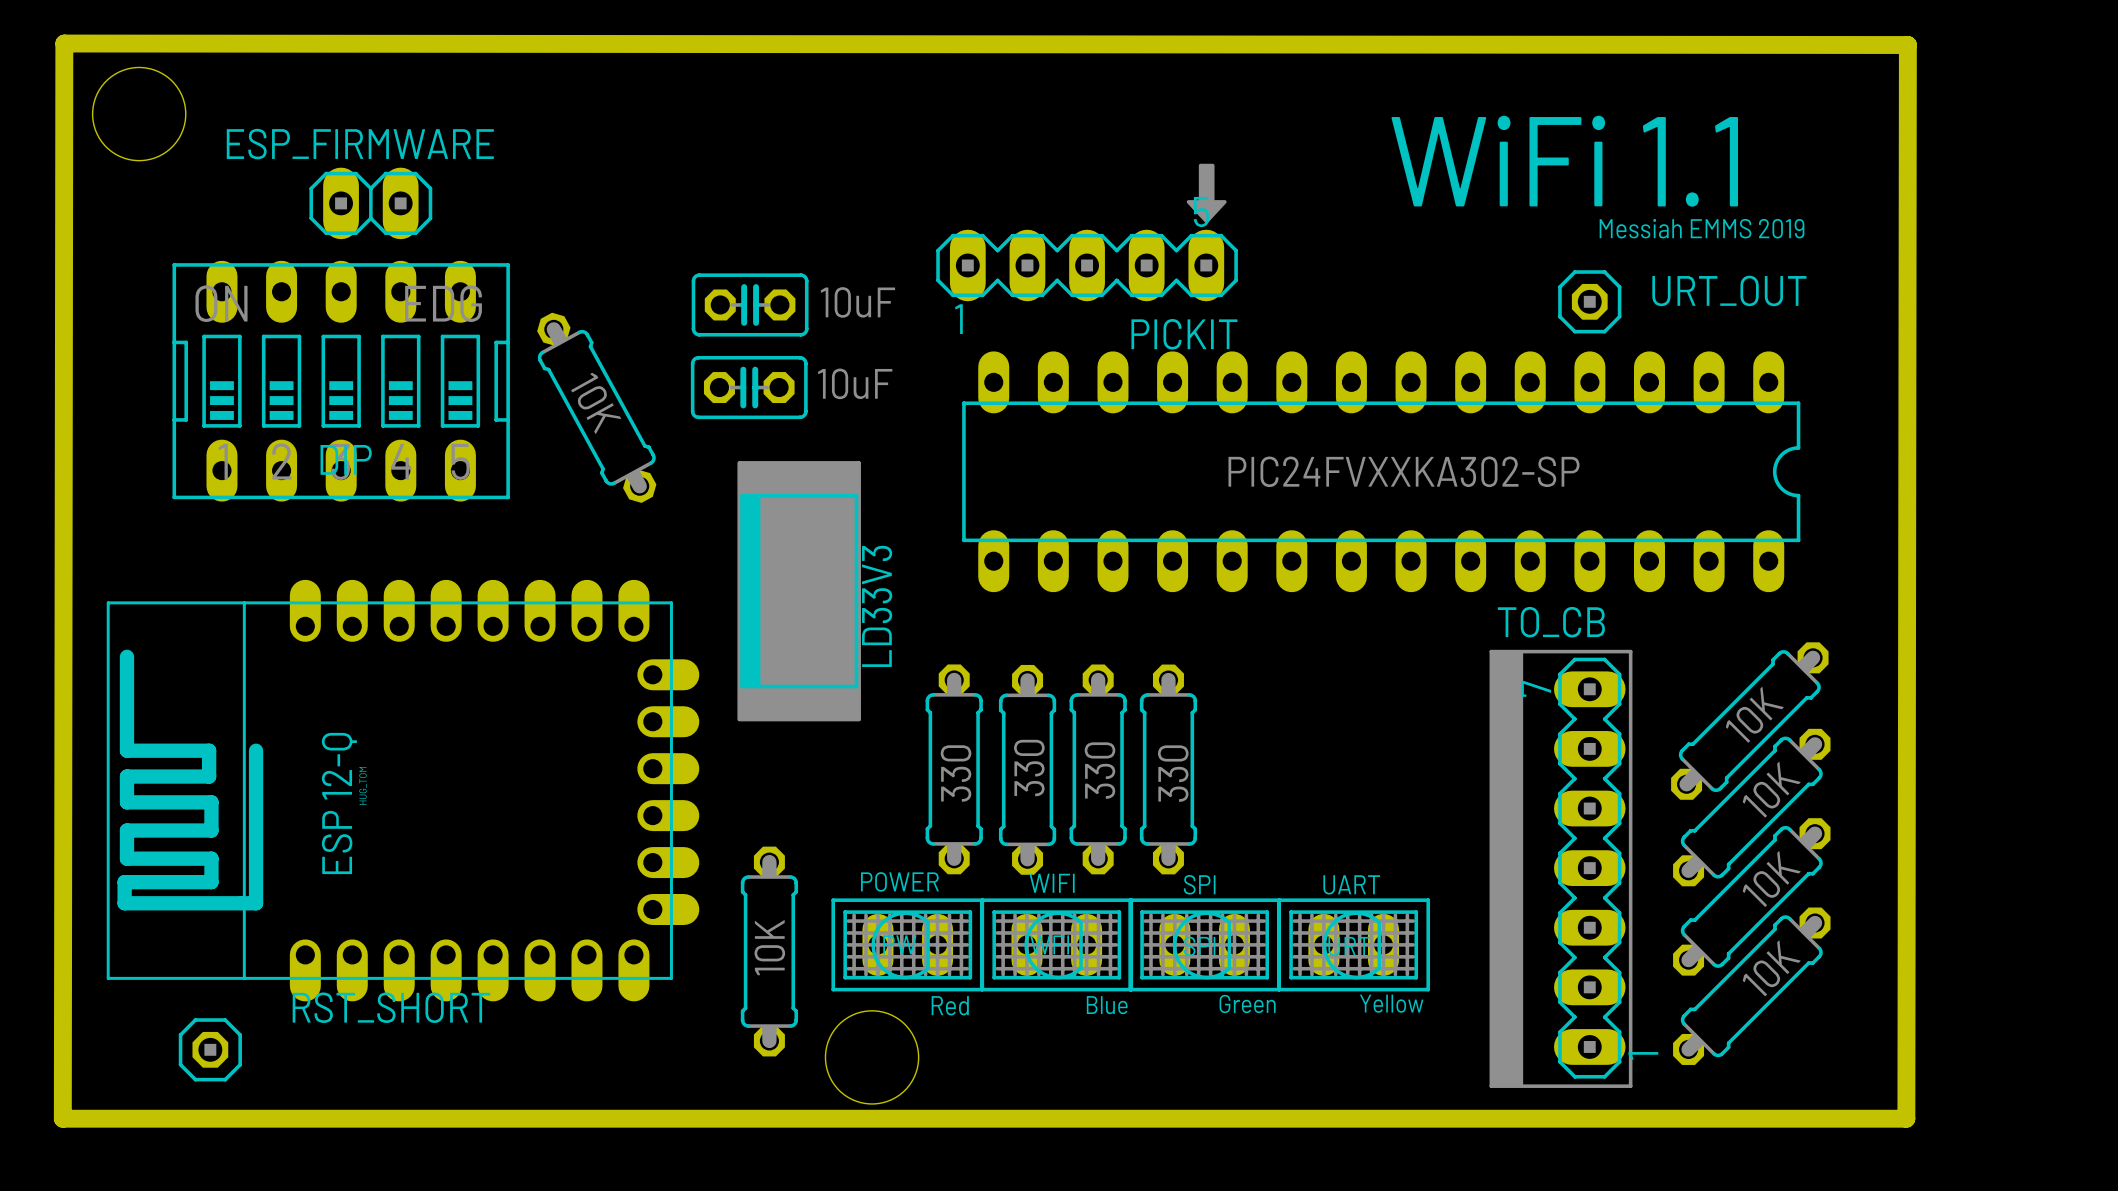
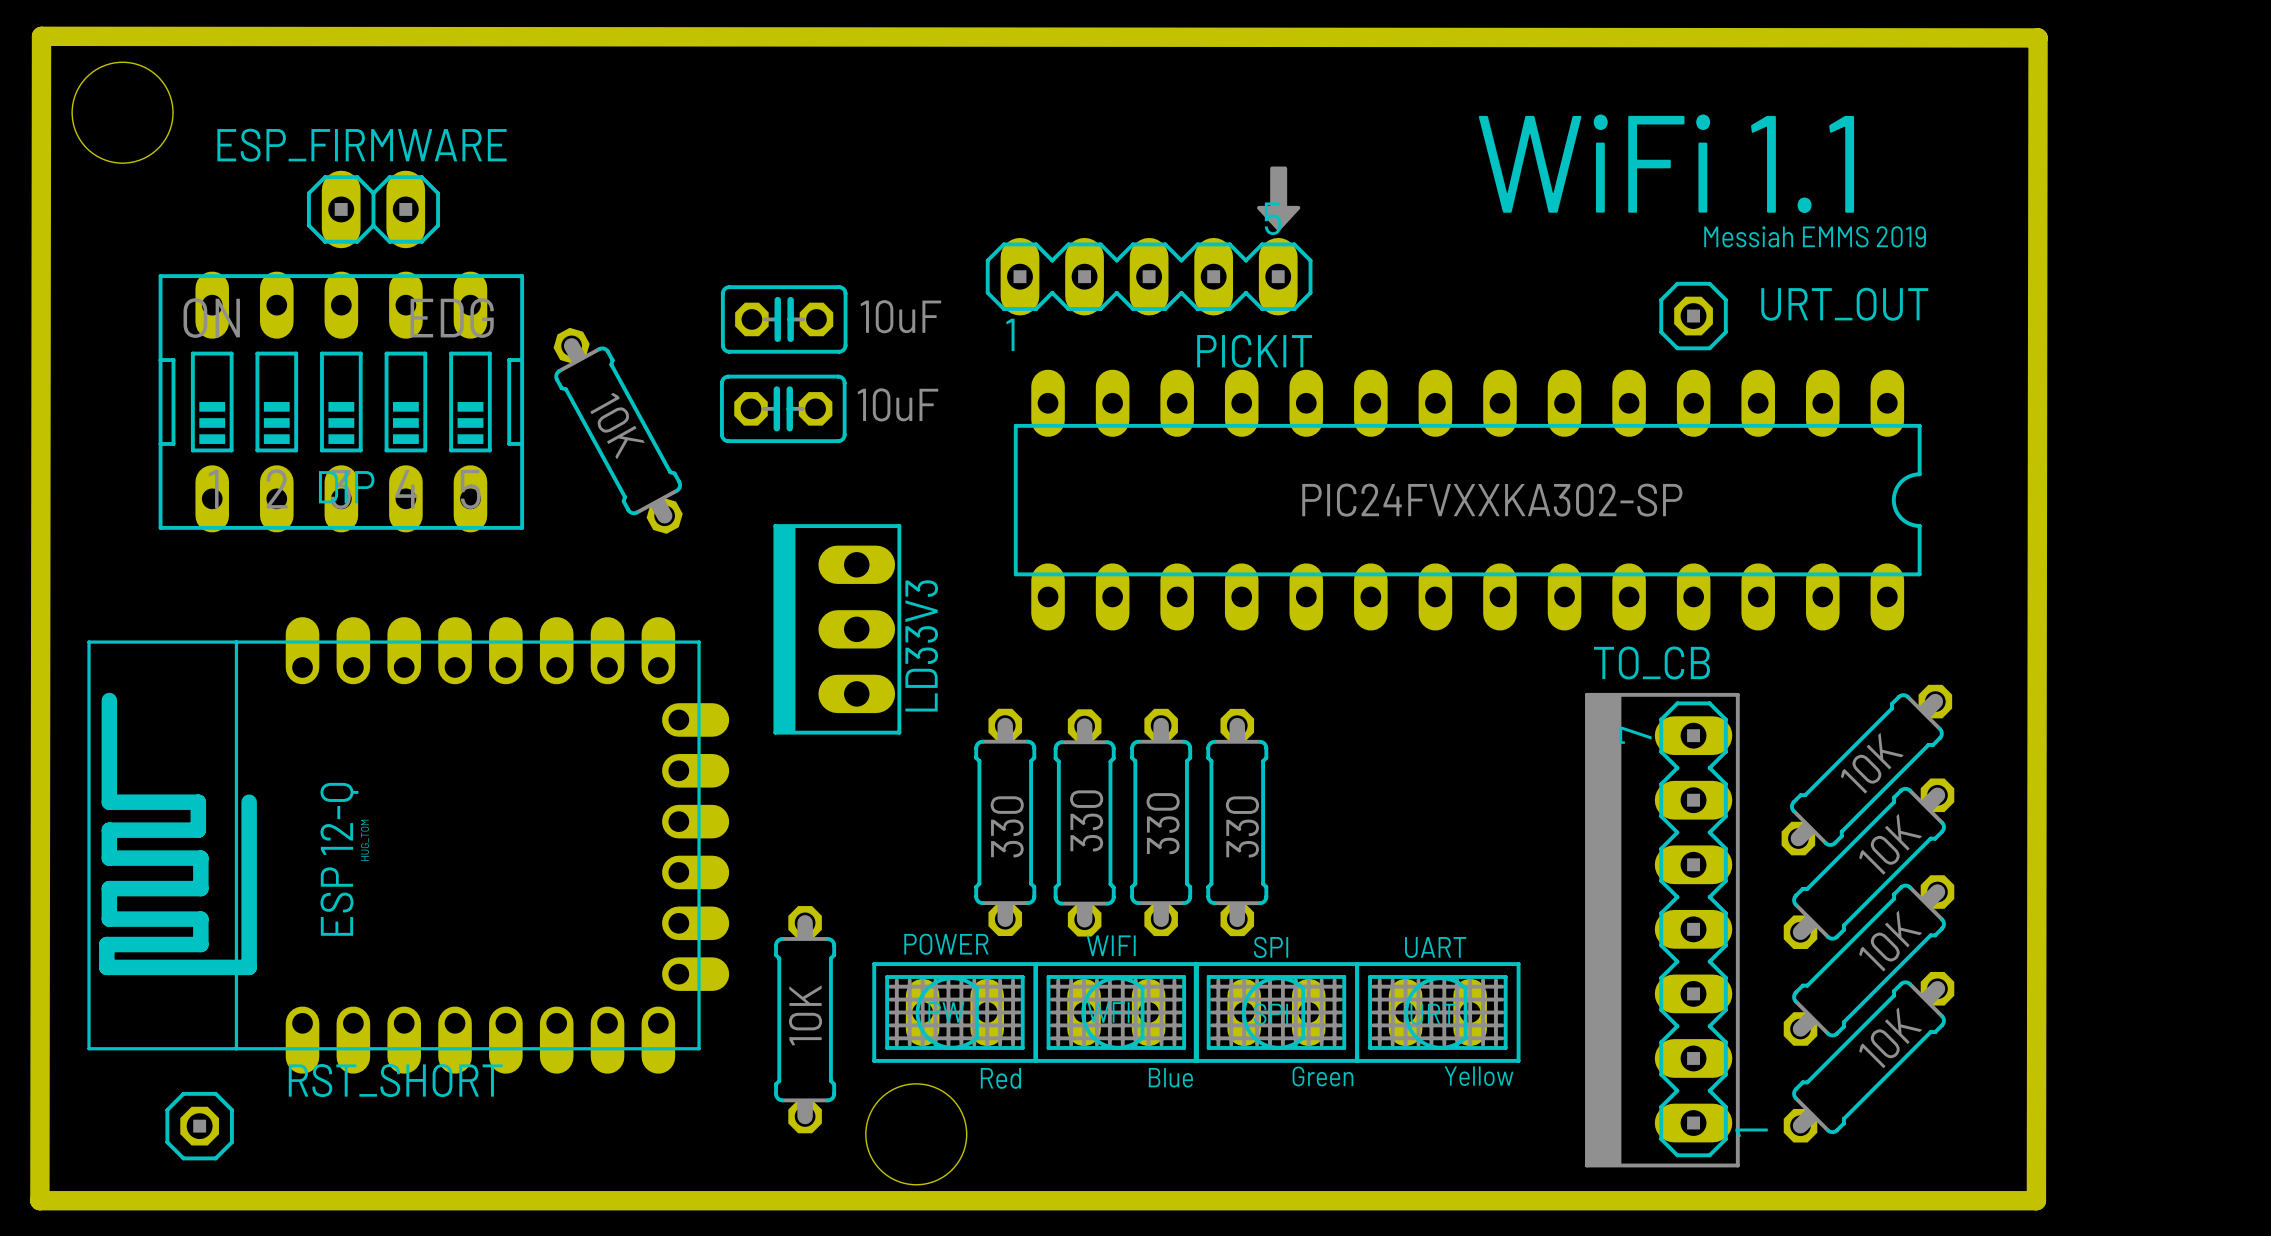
LD33V3 footprint: [737, 461, 861, 722] -> [773, 524, 902, 735]

